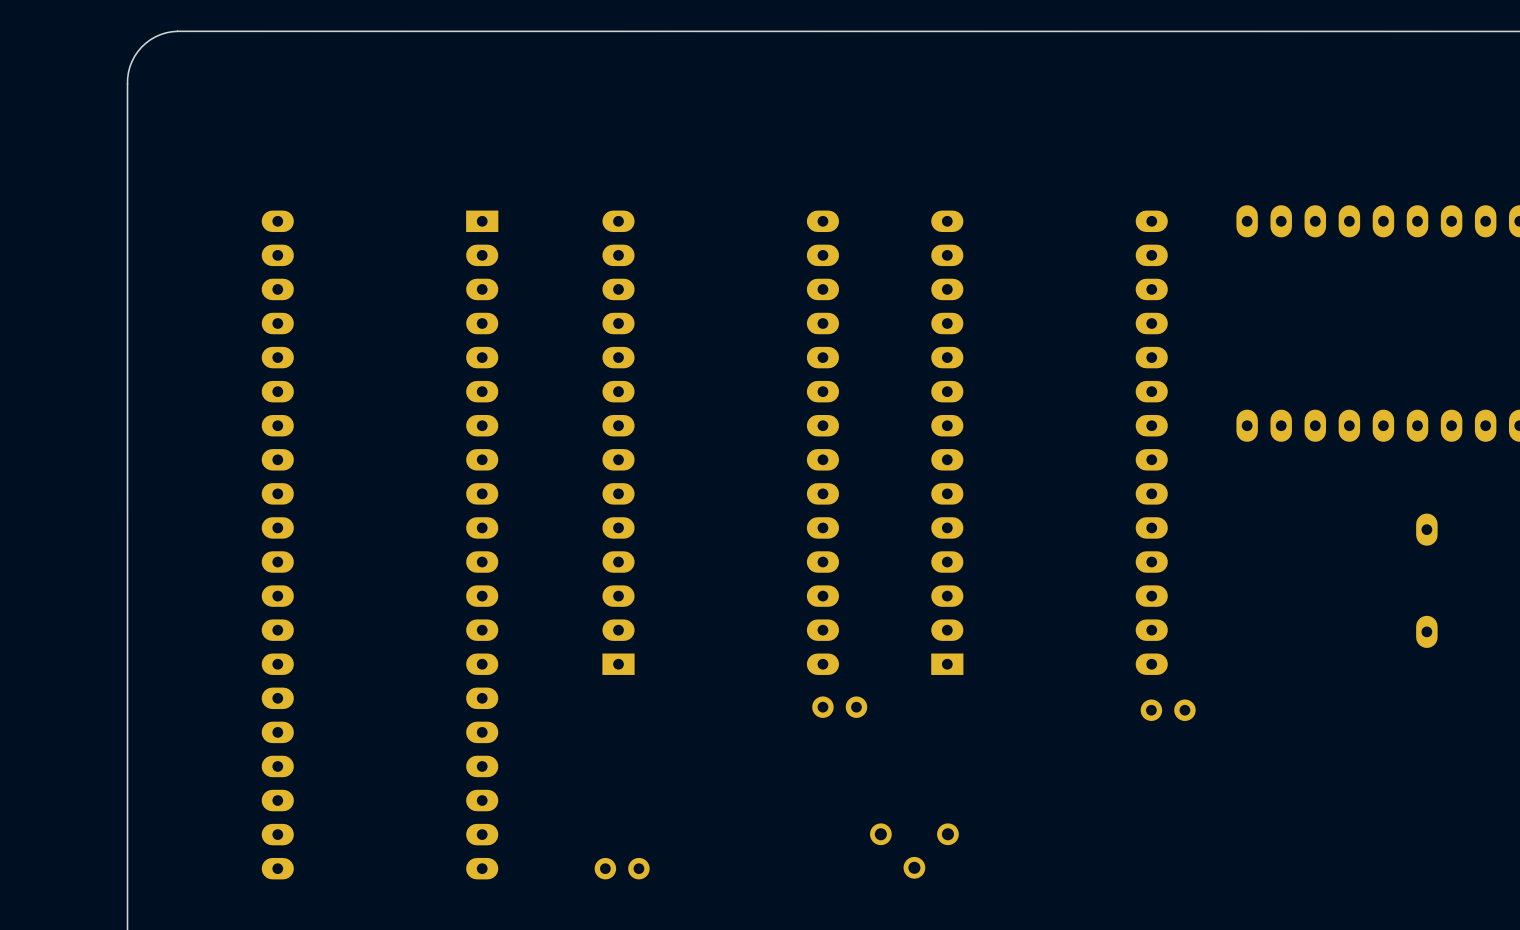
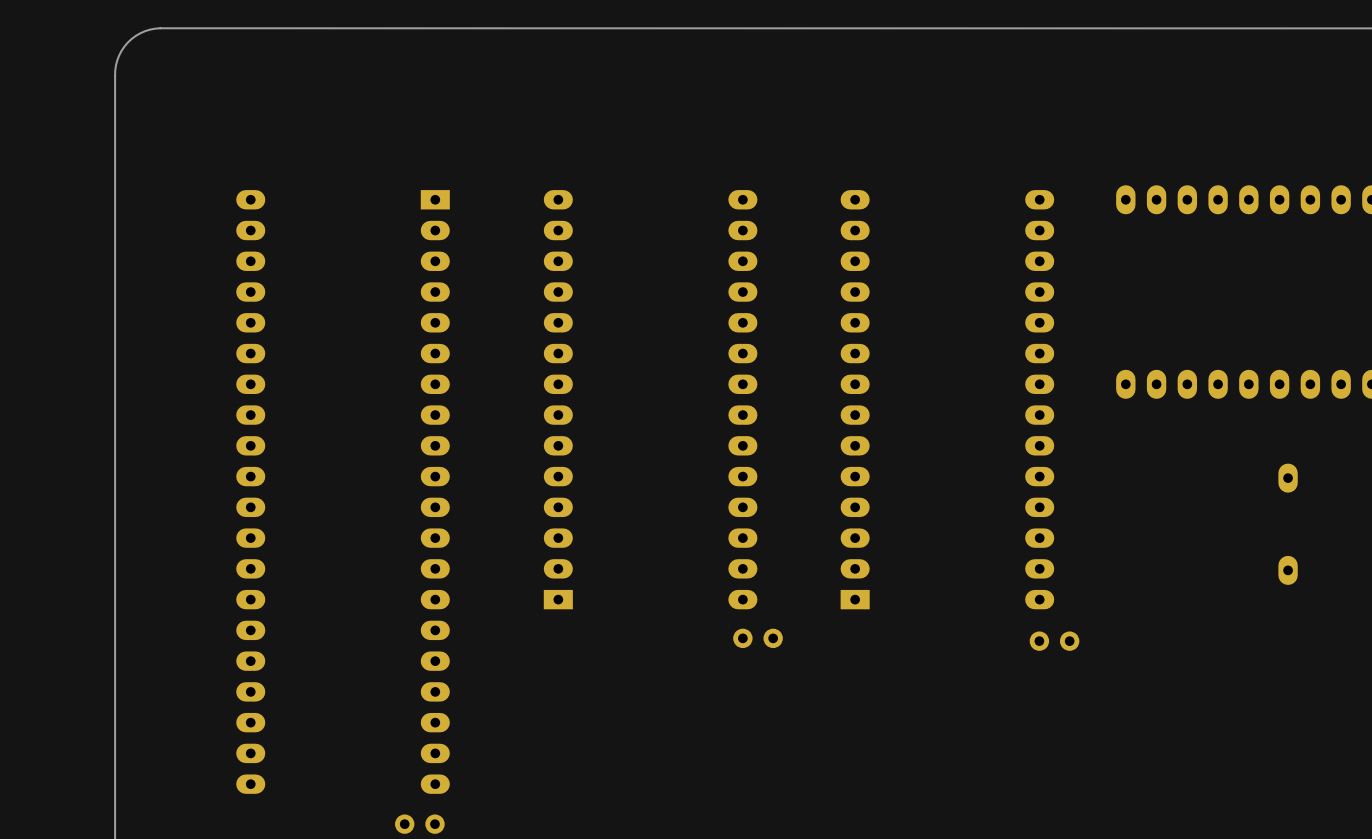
part: (914, 851) -> none
part position: (622, 868) -> (419, 824)

